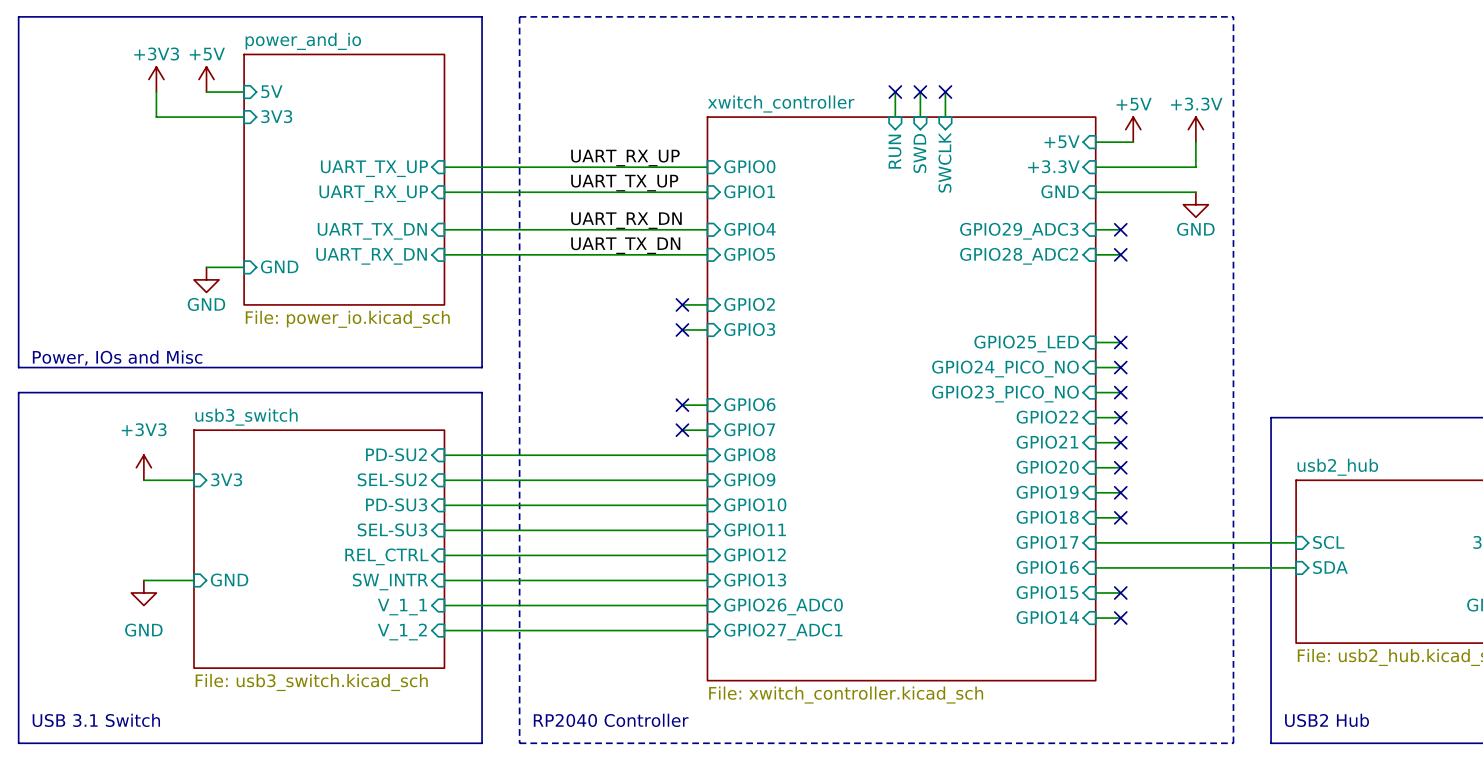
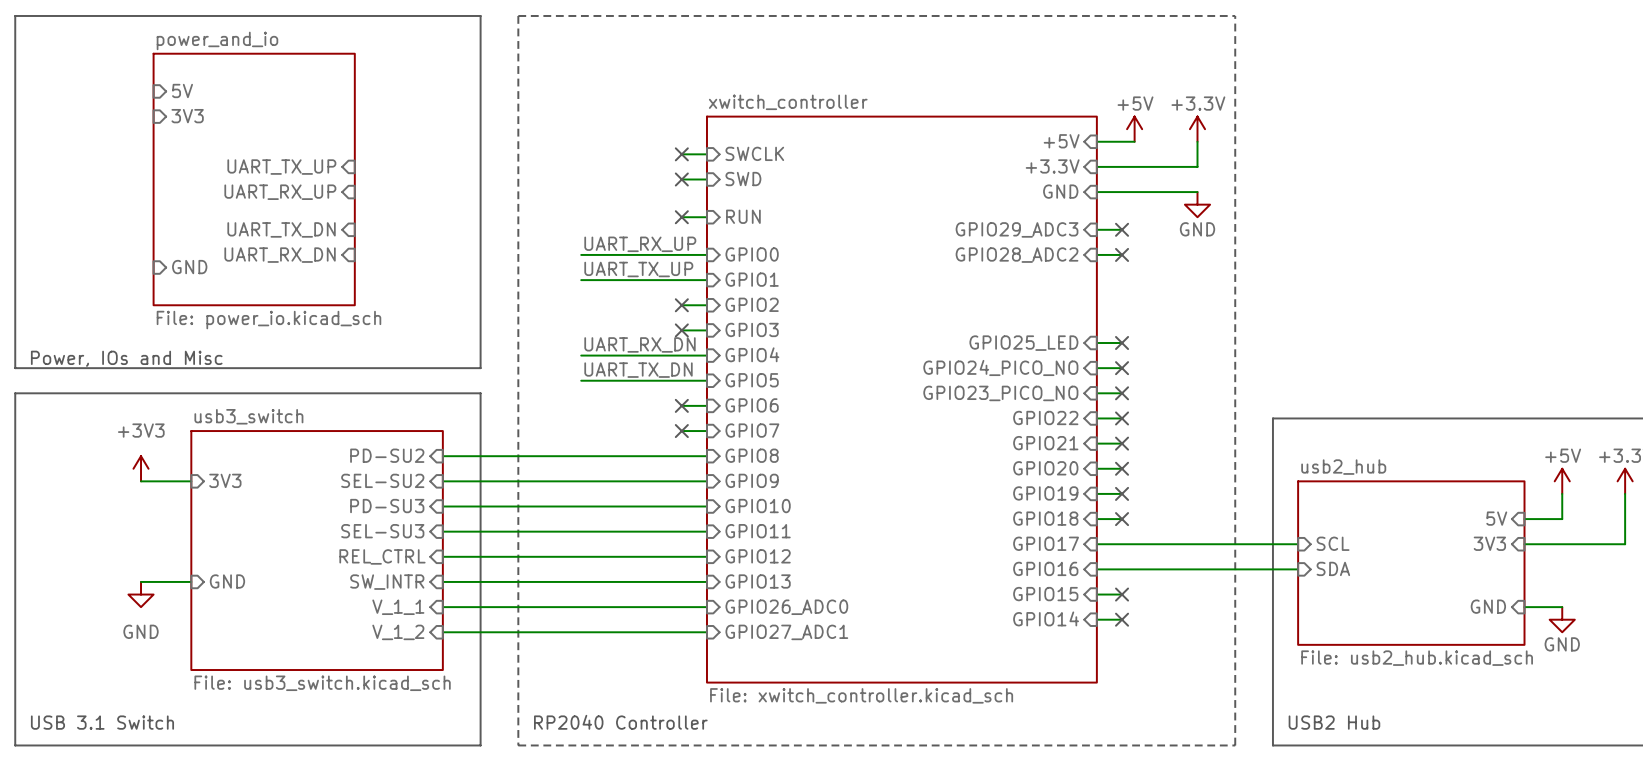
power symbol: +3V3 (156, 79) -> none
power symbol: +5V (206, 79) -> none
sheet pin position: 5V (271, 91) -> 5V (182, 90)
wire: (156, 92) (156, 117) (244, 117) -> none
wire: (206, 92) (244, 92) -> none
wire: (895, 92) (895, 117) -> none
no-connect mark: (895, 92) -> none
wire: (920, 92) (920, 117) -> none
no-connect mark: (920, 92) -> none
wire: (945, 92) (945, 117) -> none
no-connect mark: (945, 92) -> none
sheet pin position: 3V3 (276, 116) -> 3V3 (187, 116)
sheet pin rotation: 0° (894, 151) -> 90° counterclockwise (743, 216)
sheet pin position: RUN (894, 151) -> RUN (743, 216)
sheet pin rotation: 0° (919, 153) -> 90° counterclockwise (743, 179)
sheet pin position: SWD (919, 153) -> SWD (743, 179)
wire: none -> (681, 154) (706, 154)
no-connect mark: none -> (681, 154)
label position: UART_RX_UP (625, 158) -> UART_RX_UP (640, 244)
sheet pin rotation: 0° (944, 162) -> 90° counterclockwise (754, 153)
sheet pin position: SWCLK (944, 162) -> SWCLK (754, 153)
sheet pin: GPIO0 (749, 166) -> none
wire: (444, 167) (707, 167) -> none
sheet pin position: UART_TX_UP (374, 168) -> UART_TX_UP (281, 167)
sheet power_and_io position: (344, 179) -> (254, 179)
wire: none -> (681, 179) (706, 179)
no-connect mark: none -> (681, 179)
label position: UART_TX_UP (624, 183) -> UART_TX_UP (638, 269)
sheet pin position: GPIO1 (749, 191) -> GPIO1 (752, 279)
wire: (444, 192) (707, 192) -> none
sheet pin position: UART_RX_UP (373, 193) -> UART_RX_UP (280, 192)
wire: none -> (681, 217) (706, 217)
no-connect mark: none -> (681, 217)
label position: UART_RX_DN (626, 220) -> UART_RX_DN (640, 344)
wire: (444, 229) (707, 229) -> none
sheet pin position: GPIO4 (749, 229) -> GPIO4 (752, 354)
sheet pin position: UART_TX_DN (372, 231) -> UART_TX_DN (281, 229)
label position: UART_TX_DN (625, 245) -> UART_TX_DN (638, 370)
wire: (444, 254) (582, 254) -> none
sheet pin: GPIO5 (749, 254) -> GPIO0 (752, 254)
sheet pin position: UART_RX_DN (371, 256) -> UART_RX_DN (280, 255)
sheet pin position: GND (279, 266) -> GND (189, 267)
wire: (206, 267) (244, 267) -> none
power symbol: GND (206, 279) -> none
wire: none -> (581, 280) (706, 280)
wire: none -> (581, 355) (706, 355)
sheet pin: none -> GPIO5 (752, 380)
wire: none -> (581, 380) (706, 380)

